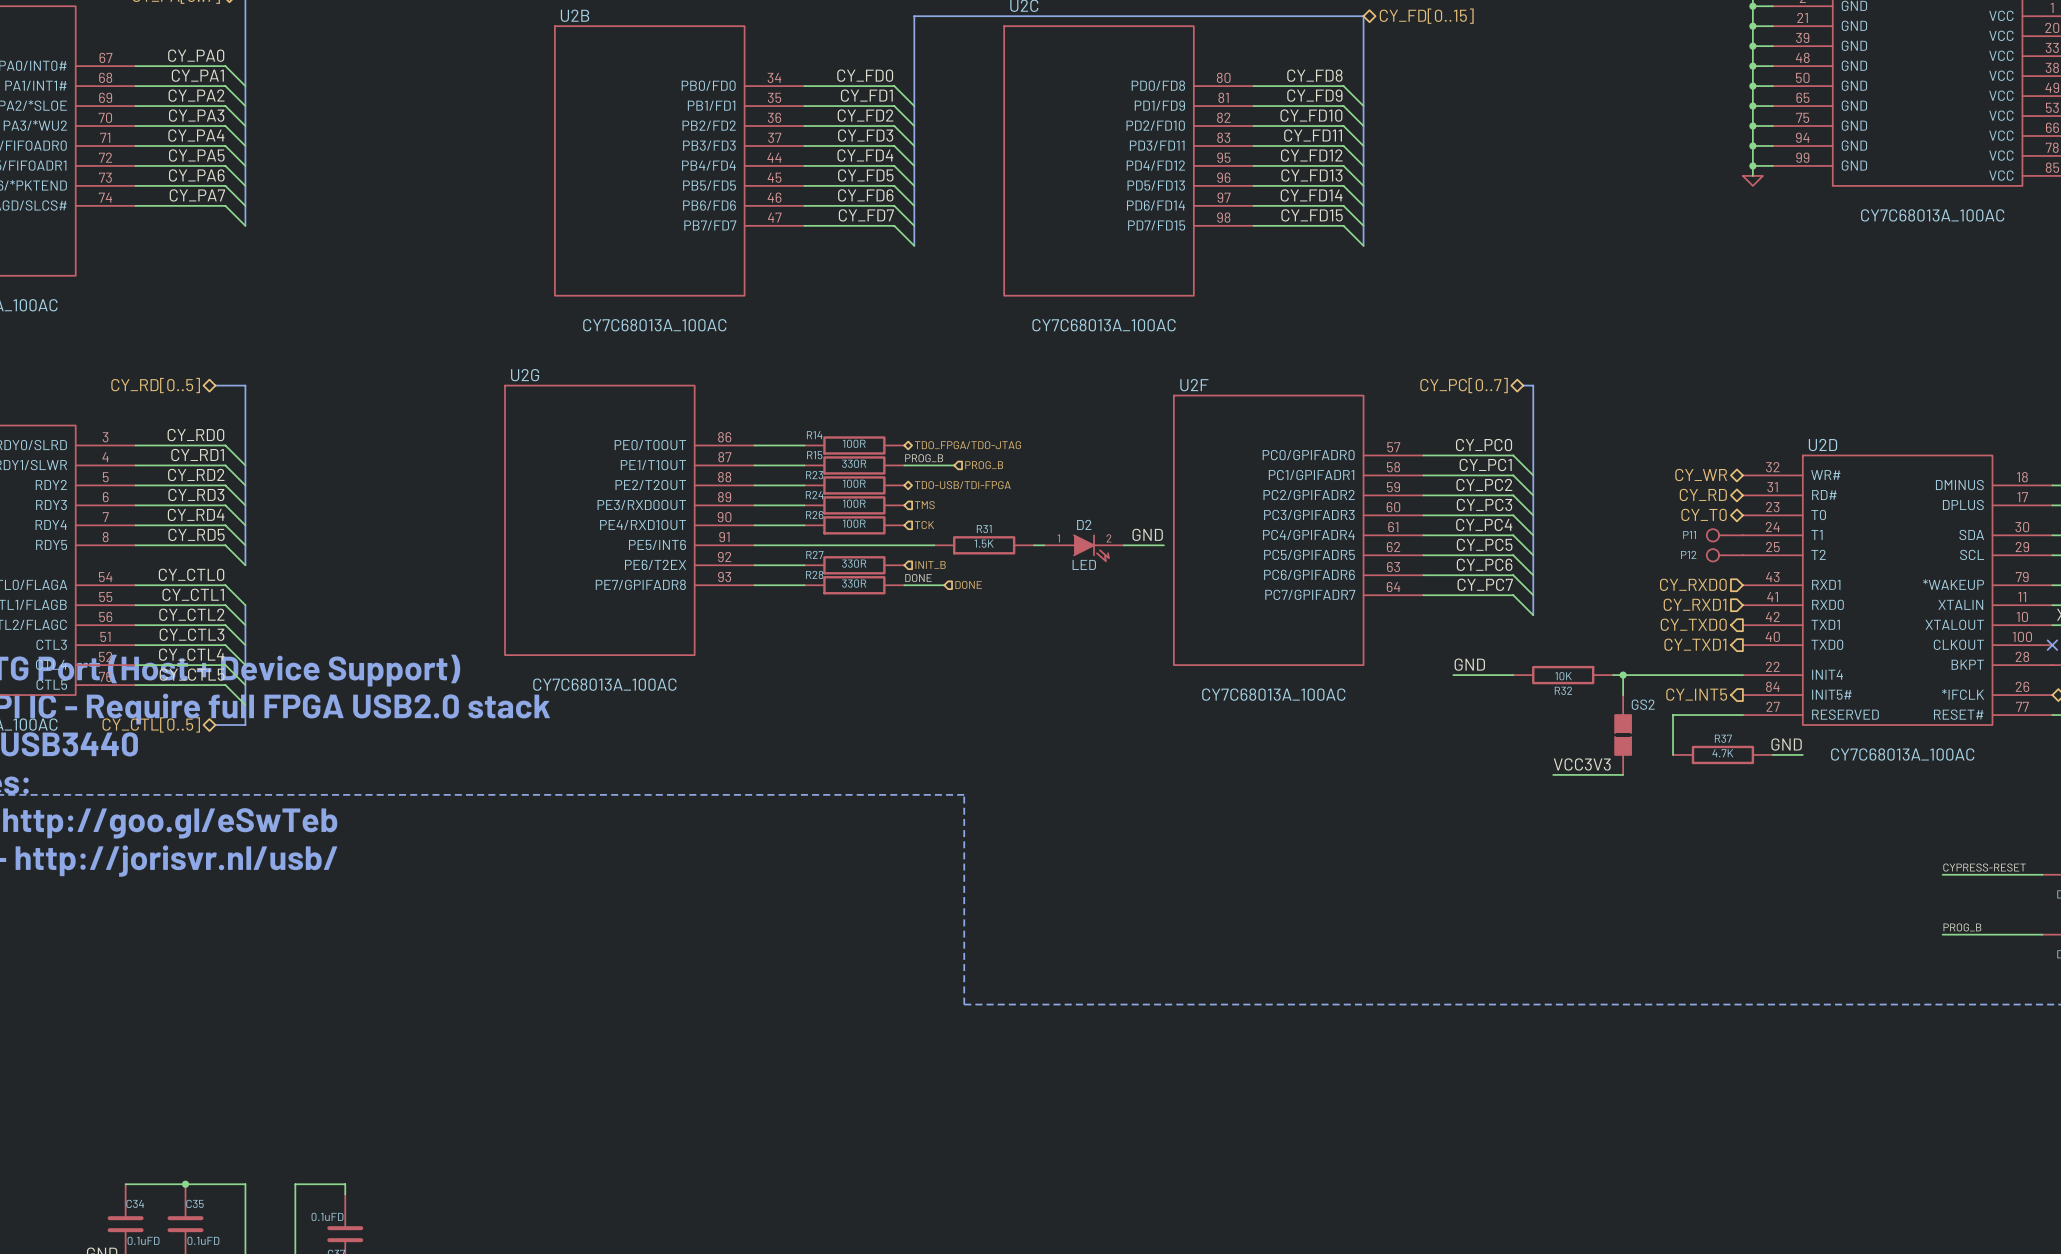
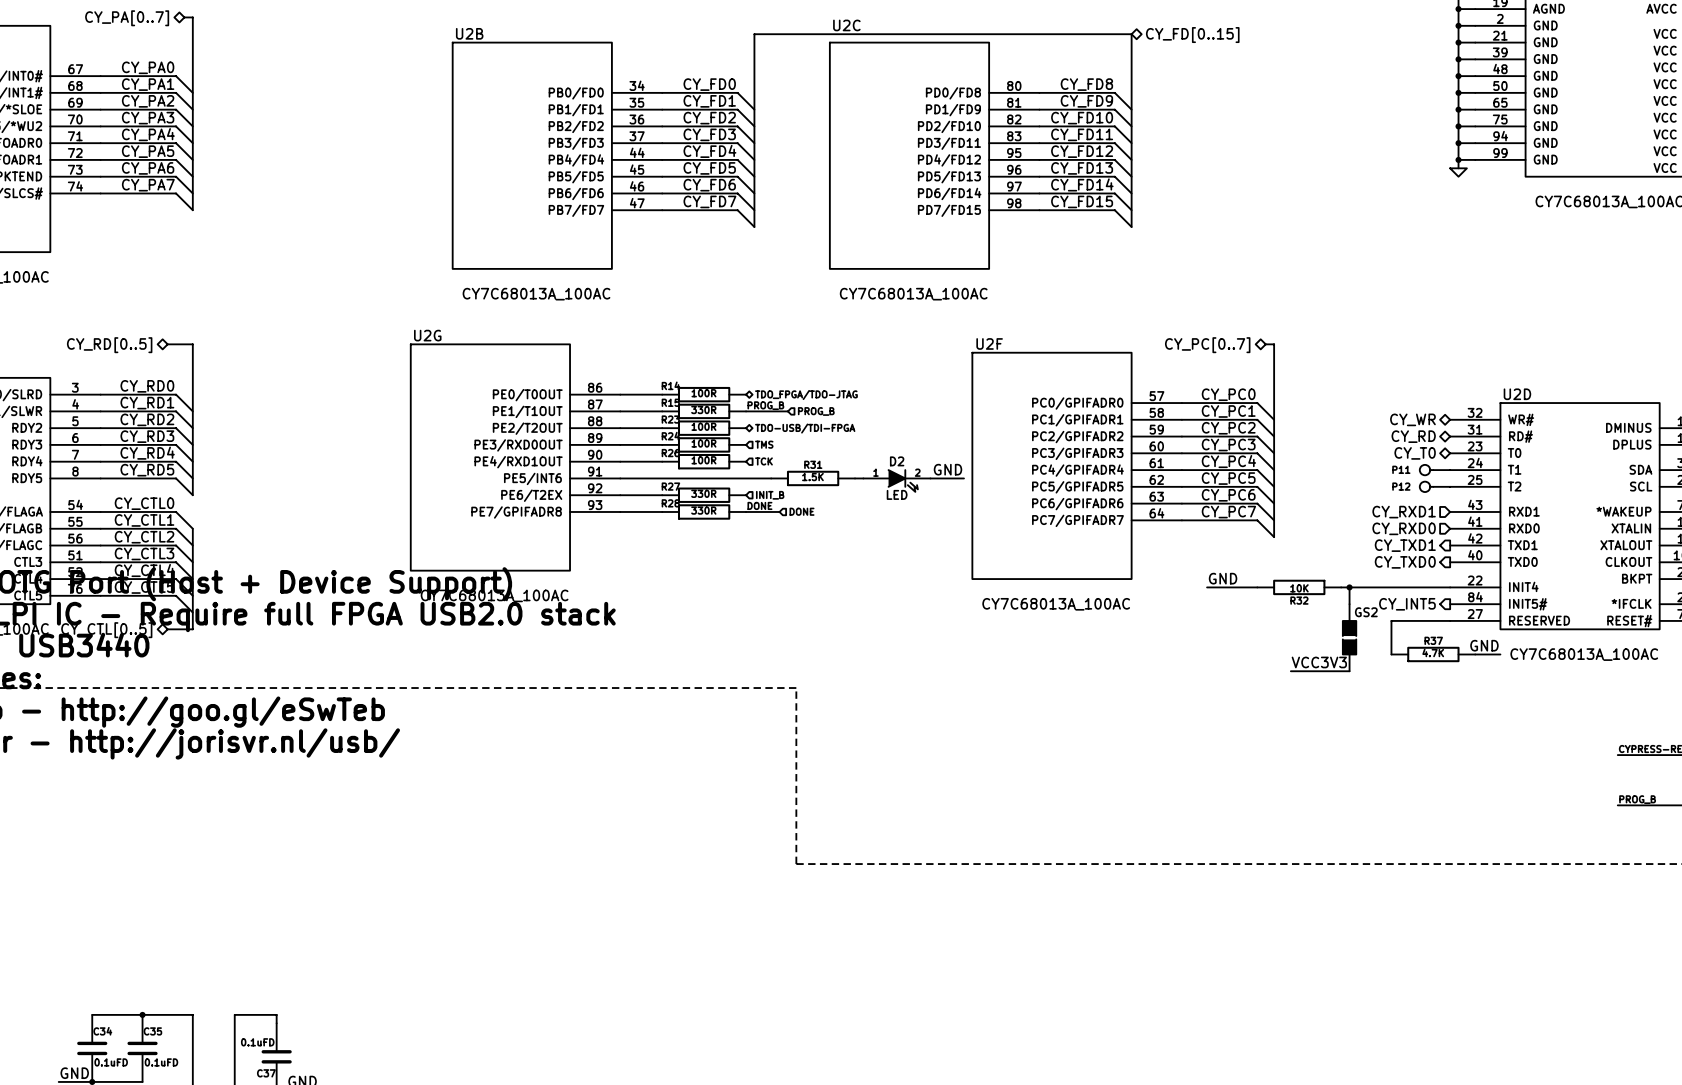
hierarchical label: CY_RXD0 (1693, 584) -> CY_RXD1 (1404, 512)
hierarchical label: CY_RXD1 (1695, 604) -> CY_RXD0 (1404, 528)
hierarchical label: CY_TXD0 (1693, 624) -> CY_TXD1 (1405, 545)
hierarchical label: CY_TXD1 (1695, 644) -> CY_TXD0 (1405, 562)

